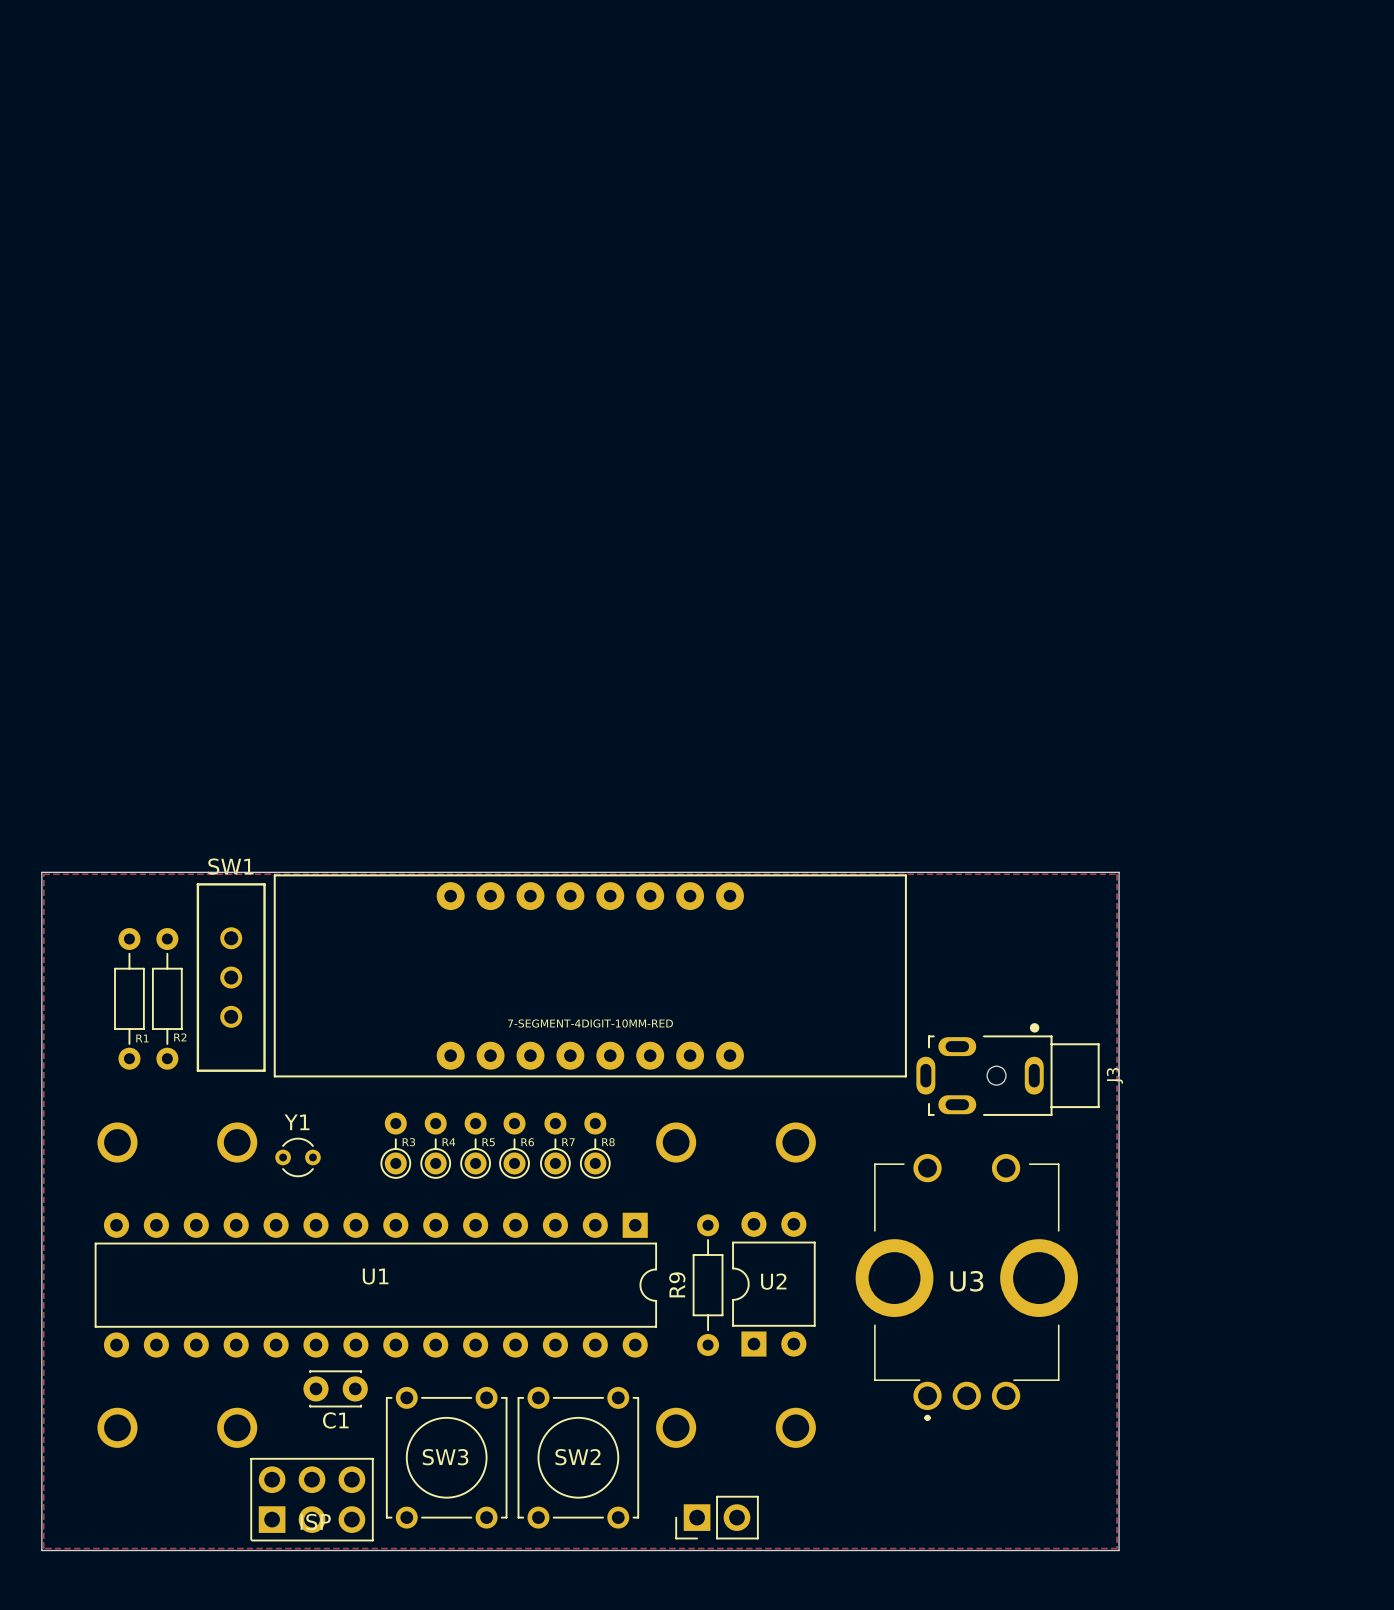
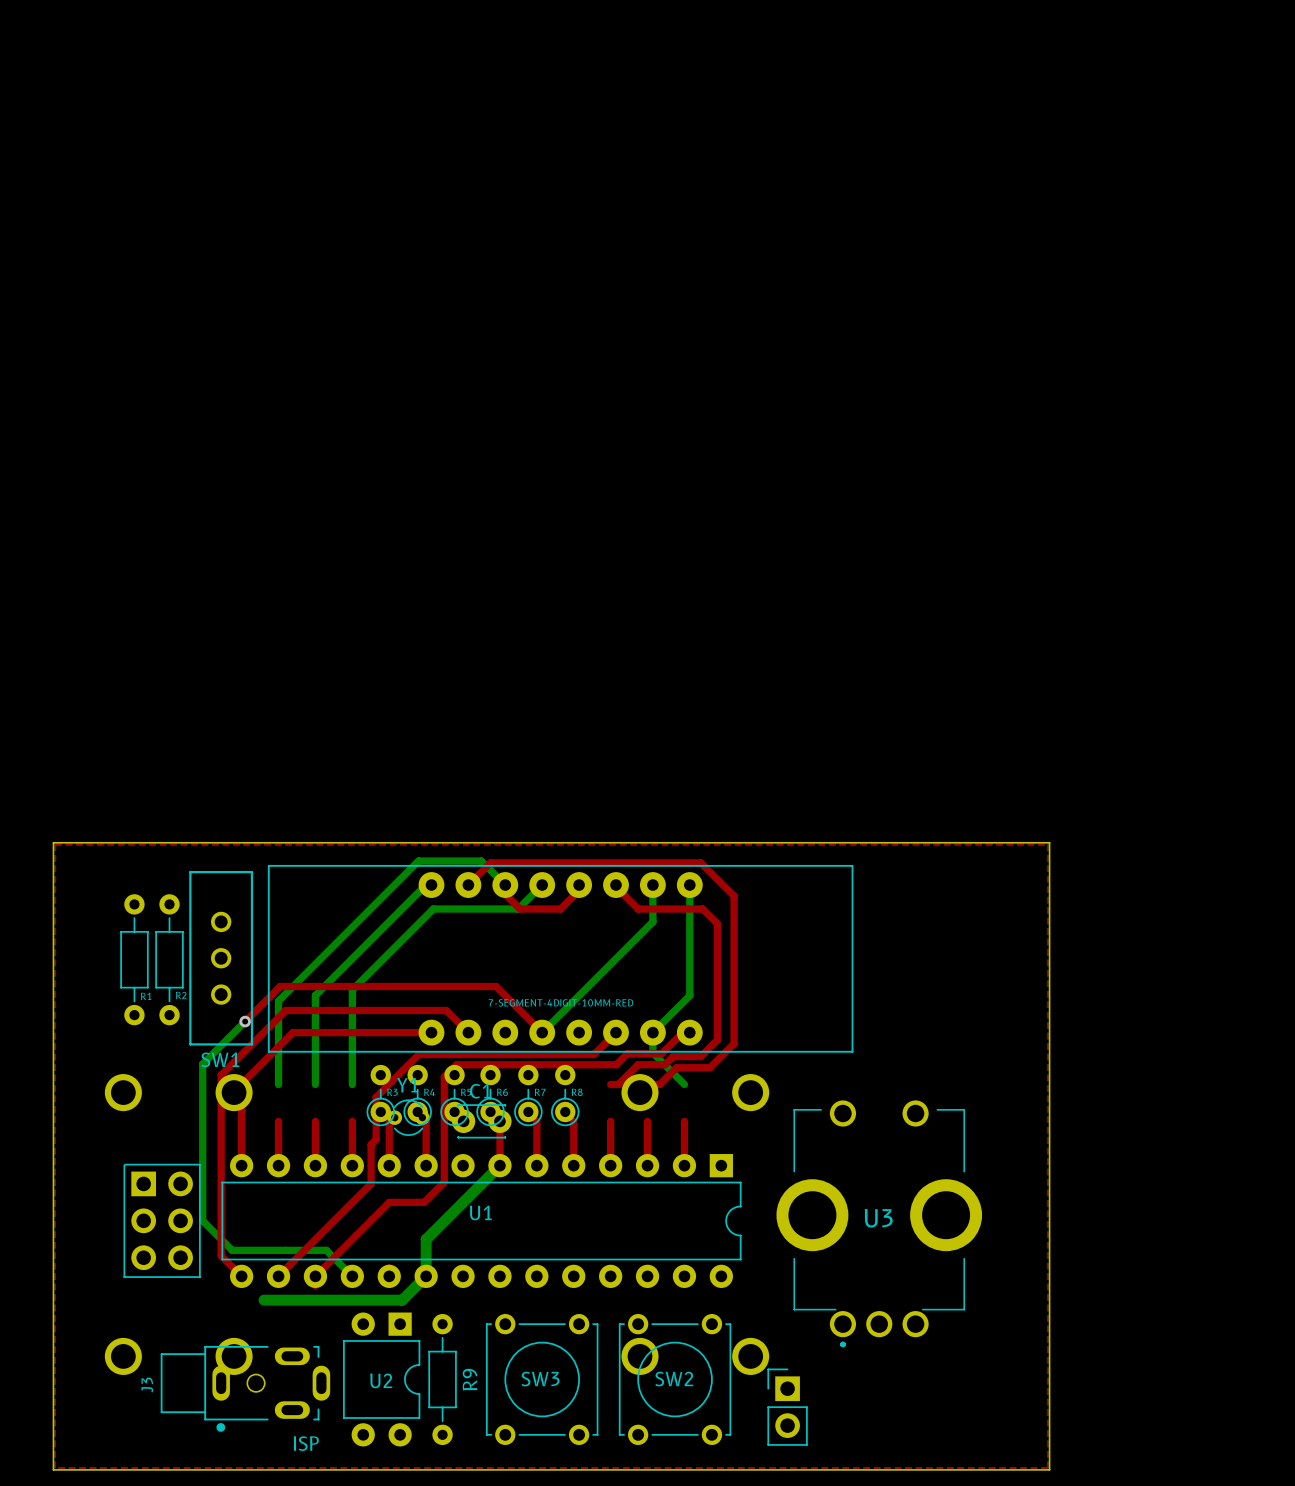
SW1 name position: SW1 (230, 866) -> SW1 (220, 1059)
bottom track: none -> (431, 885) (425, 885) (315, 995) (315, 1084)
top track: none -> (468, 885) (490, 862) (700, 862) (734, 896) (734, 1043) (710, 1067) (676, 1067) (659, 1084) (647, 1084)
top track: none -> (505, 885) (505, 894) (520, 909) (560, 909) (579, 890) (579, 885)
bottom track: none -> (505, 885) (481, 861) (418, 861) (278, 1001) (278, 1084)
bottom track: none -> (542, 885) (518, 909) (433, 909) (352, 990) (352, 1084)
top track: none -> (616, 885) (638, 909) (702, 909) (717, 923) (717, 1040) (700, 1056) (673, 1056) (665, 1064) (638, 1064) (618, 1084) (610, 1084)
bottom track: none -> (652, 885) (652, 921) (542, 1032)
bottom track: none -> (689, 885) (689, 995) (652, 1032) (652, 1052) (684, 1084)
part position: (590, 975) -> (560, 958)
SW1 position: (231, 977) -> (221, 958)
top track: none -> (245, 1021) (280, 986) (496, 986) (542, 1032)
bottom track: none -> (245, 1021) (202, 1063) (202, 1220) (232, 1250) (326, 1250) (352, 1276)
via: none -> (245, 1021)
J3 rotation: 0° (1008, 1069) -> 180° (245, 1388)
J3 position: (1008, 1069) -> (245, 1388)
top track: none -> (431, 1032) (292, 1032) (241, 1083) (241, 1165)
top track: none -> (468, 1032) (446, 1010) (285, 1010) (221, 1075) (221, 1255) (241, 1276)
top track: none -> (616, 1032) (594, 1054) (418, 1054) (376, 1097) (376, 1139) (371, 1144) (371, 1183) (278, 1276) (280, 1276)
top track: none -> (689, 1032) (682, 1032) (661, 1053) (627, 1053) (616, 1064) (456, 1064) (444, 1077) (444, 1182) (424, 1202) (389, 1202) (315, 1276) (315, 1285)
Y1 position: (298, 1157) -> (408, 1117)
top track: none -> (394, 1117) (389, 1123) (389, 1165)
top track: none -> (422, 1117) (426, 1121) (426, 1165)
top track: none -> (278, 1121) (278, 1165)
top track: none -> (315, 1121) (315, 1165)
top track: none -> (352, 1121) (352, 1165)
top track: none -> (499, 1121) (499, 1165)
top track: none -> (536, 1121) (536, 1165)
top track: none -> (573, 1121) (573, 1165)
top track: none -> (610, 1121) (610, 1165)
top track: none -> (647, 1121) (647, 1165)
top track: none -> (684, 1121) (684, 1165)
bottom track: none -> (499, 1165) (426, 1239) (426, 1276) (402, 1300) (263, 1300)
R9 name position: R9 (677, 1284) -> R9 (470, 1379)
U2 rotation: 0° (773, 1284) -> 180° (381, 1379)
U2 position: (773, 1284) -> (381, 1379)
U1 position: (375, 1285) -> (481, 1221)
R9 position: (708, 1285) -> (442, 1379)
U3 position: (966, 1287) -> (879, 1223)
C1 position: (335, 1388) -> (481, 1121)
C1 name position: C1 (335, 1420) -> C1 (480, 1091)
SW3 position: (446, 1457) -> (542, 1379)
SW2 position: (578, 1457) -> (675, 1379)
part rotation: 0° (312, 1499) -> 90° clockwise (162, 1220)
part position: (312, 1499) -> (162, 1220)
part rotation: 0° (717, 1517) -> 90° clockwise (787, 1407)
part position: (717, 1517) -> (787, 1407)

